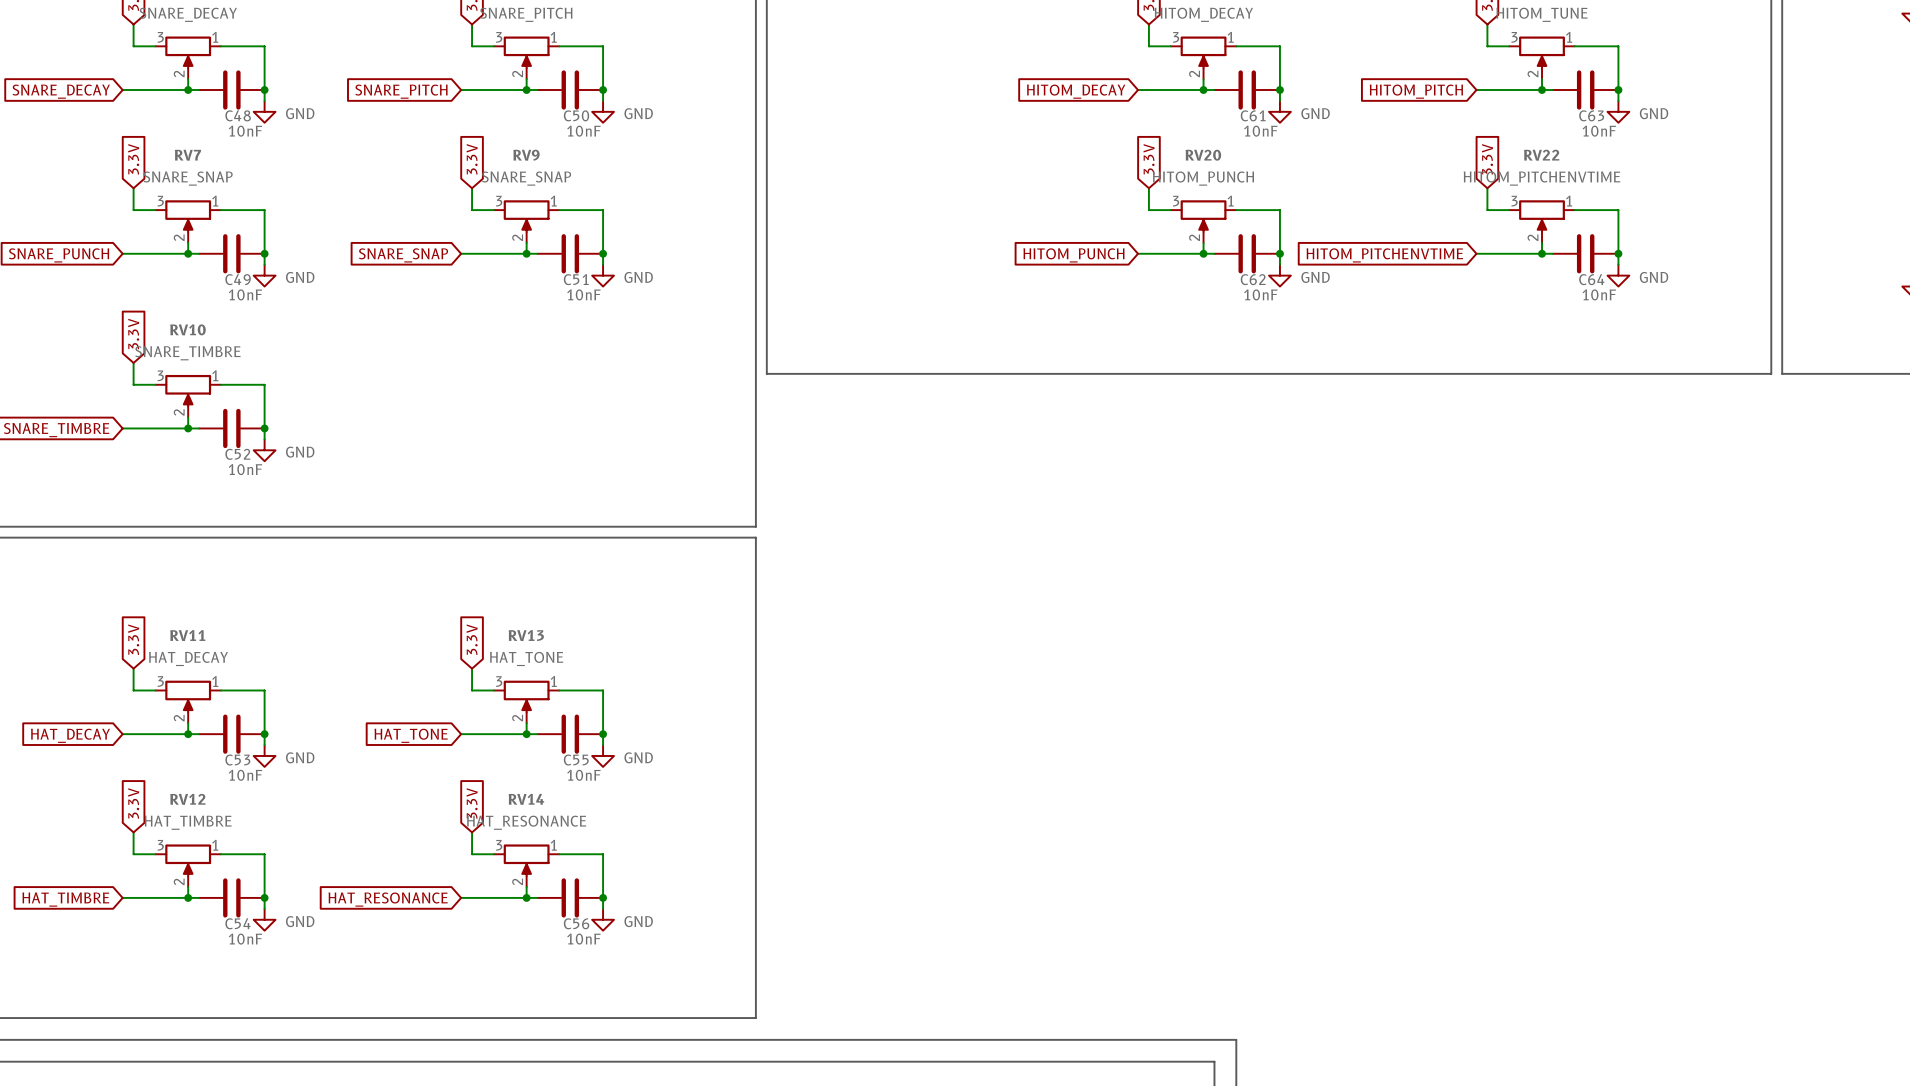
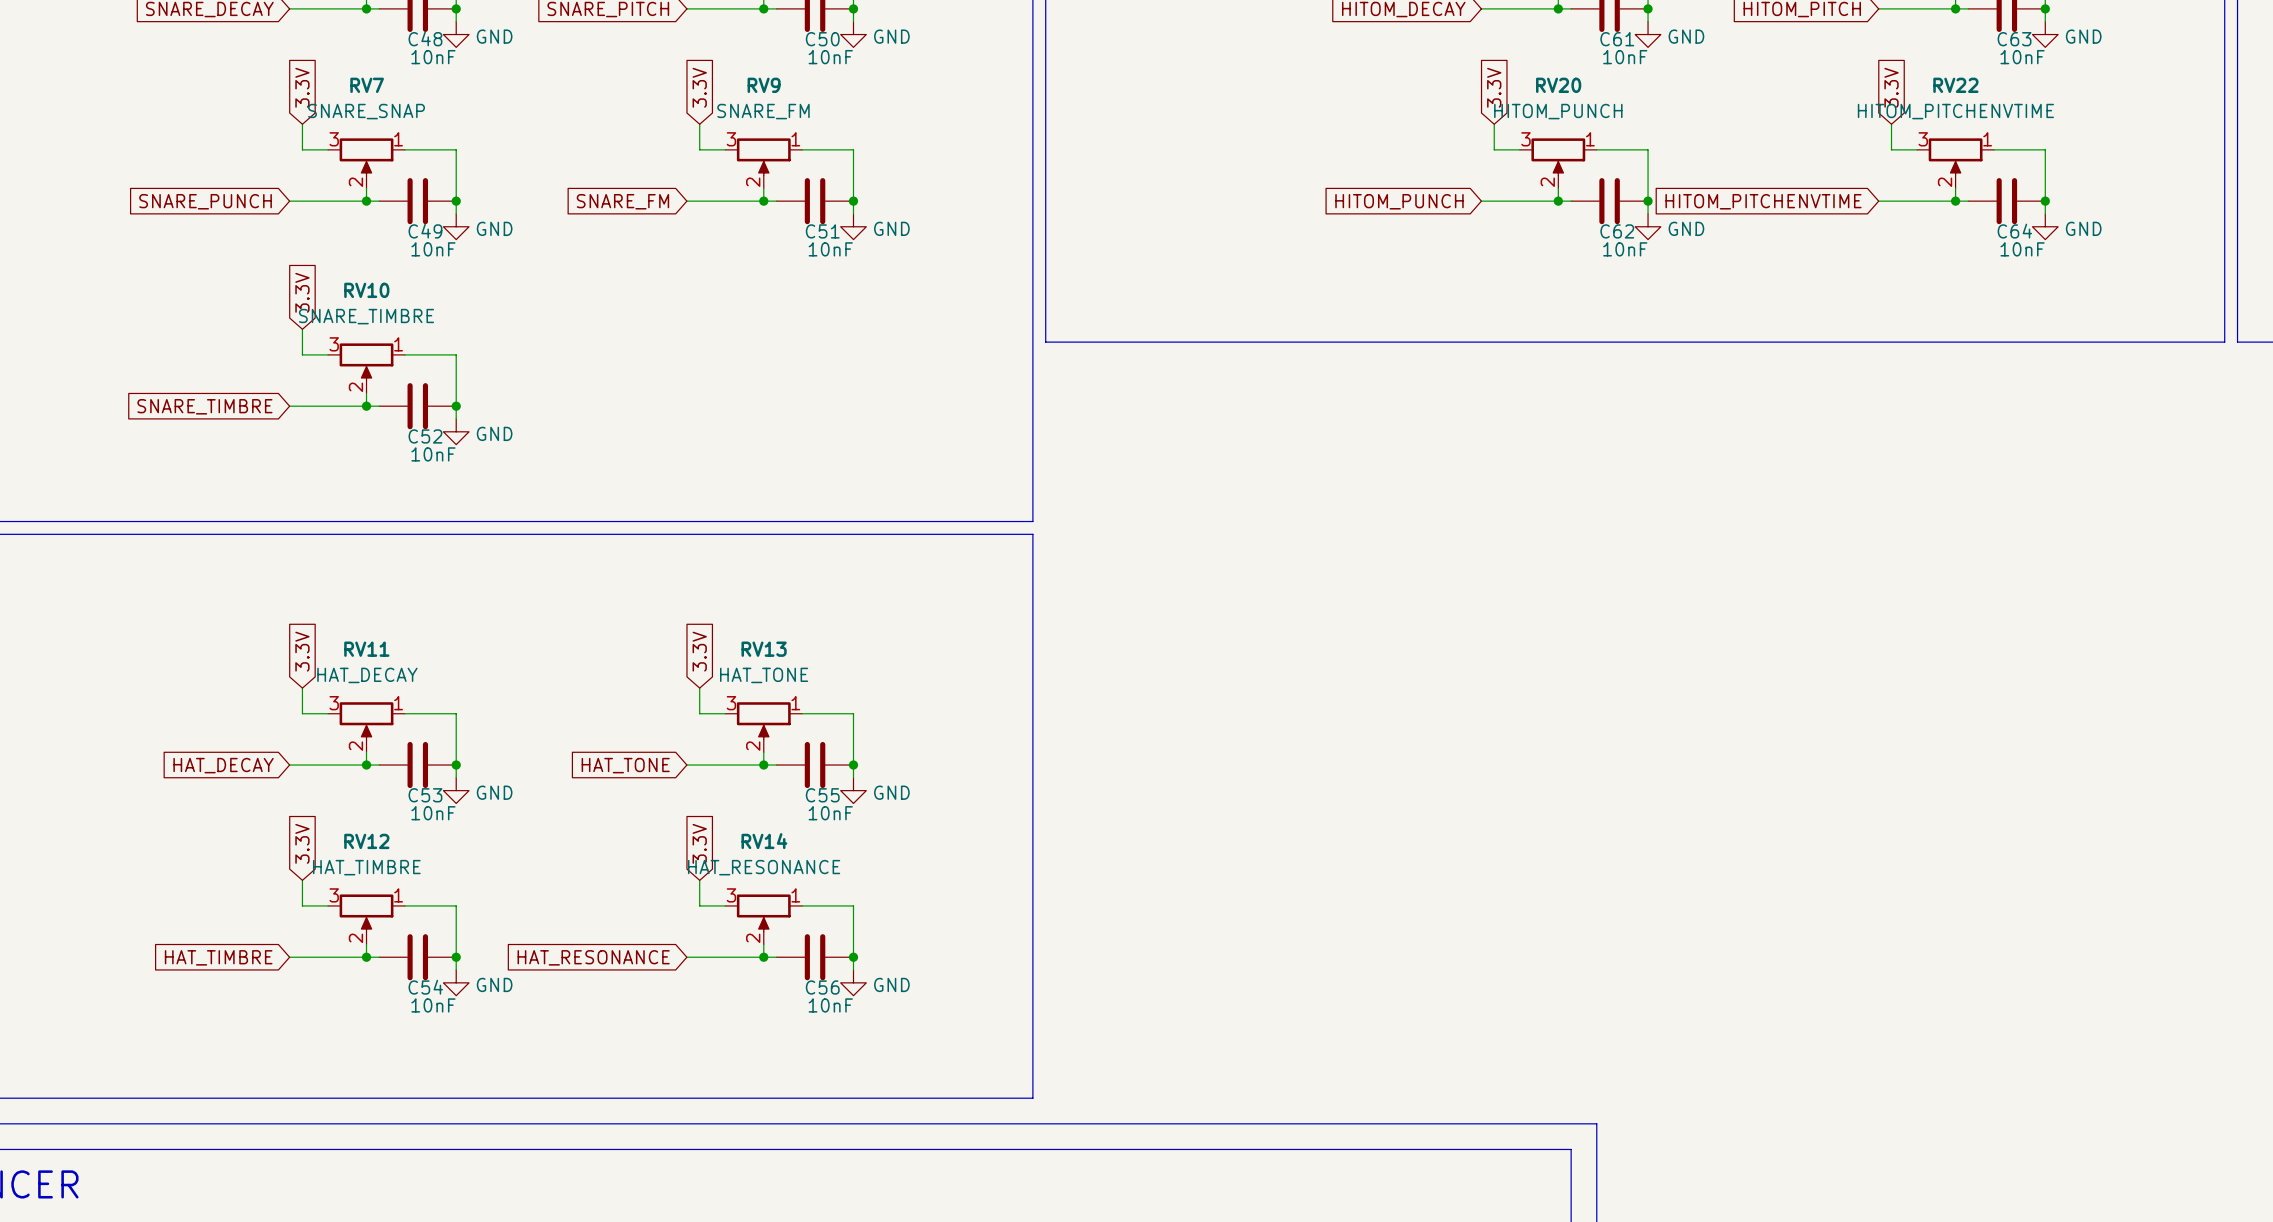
RV9 value: SNARE_SNAP (526, 178) -> SNARE_FM (763, 111)
global label: SNARE_SNAP (403, 255) -> SNARE_FM (622, 201)

